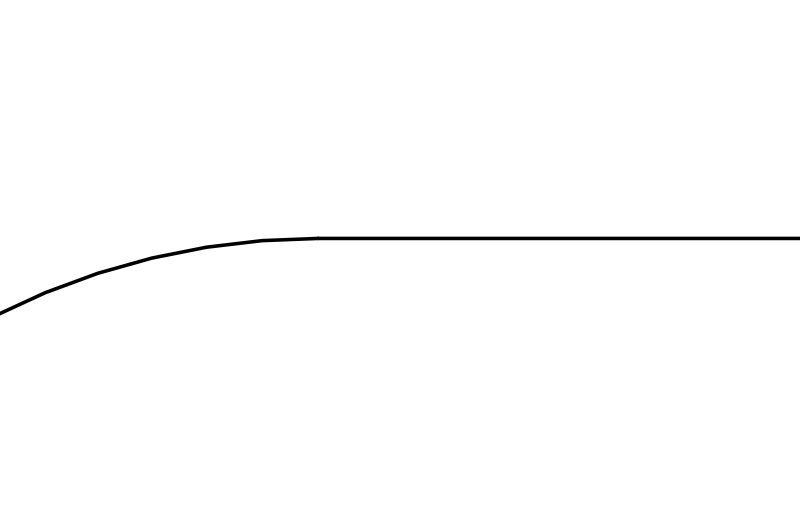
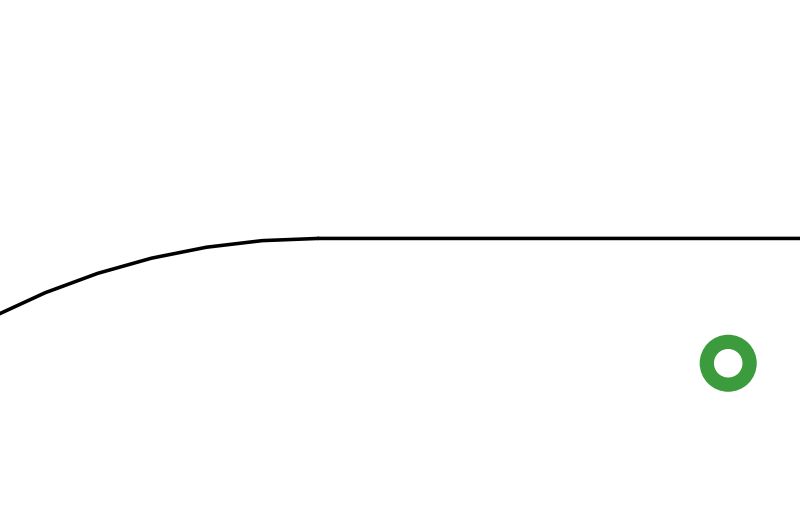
via: none -> (728, 363)

